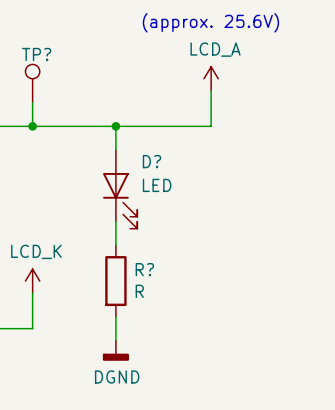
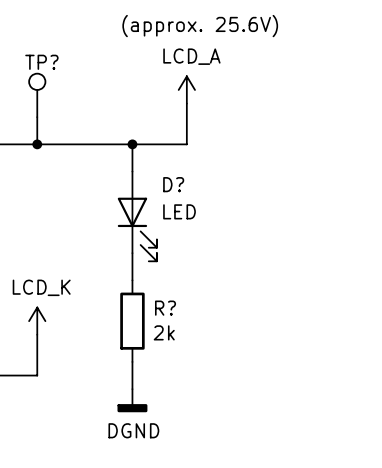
text position: (approx. 25.6V) (210, 22) -> (approx. 25.6V) (200, 26)
power symbol position: LCD_A (211, 78) -> LCD_A (186, 89)
wire: (211, 90) (211, 126) (163, 126) -> (186, 103) (186, 144)
R? value: R (139, 291) -> 2k (164, 332)

